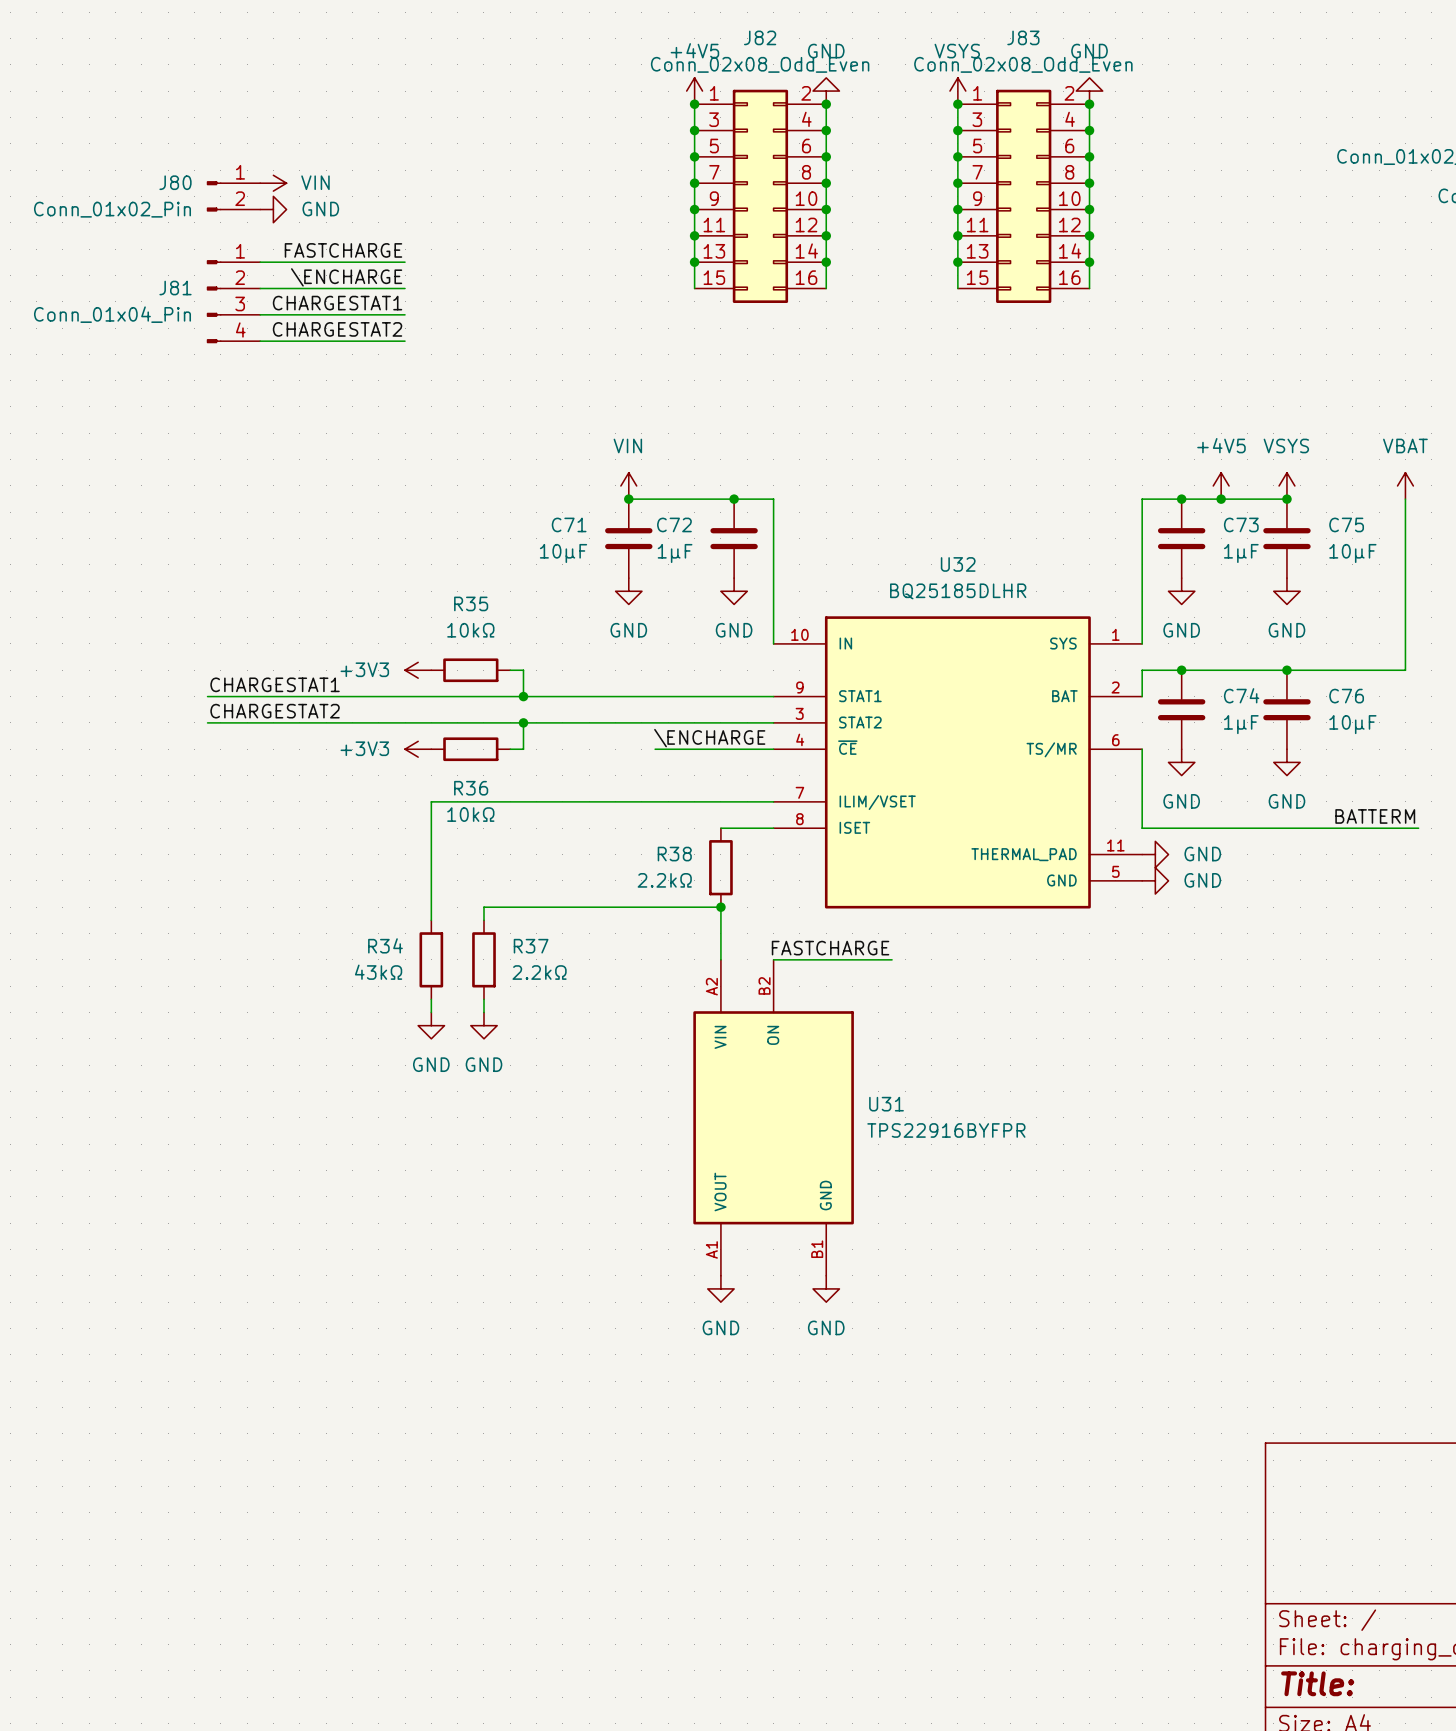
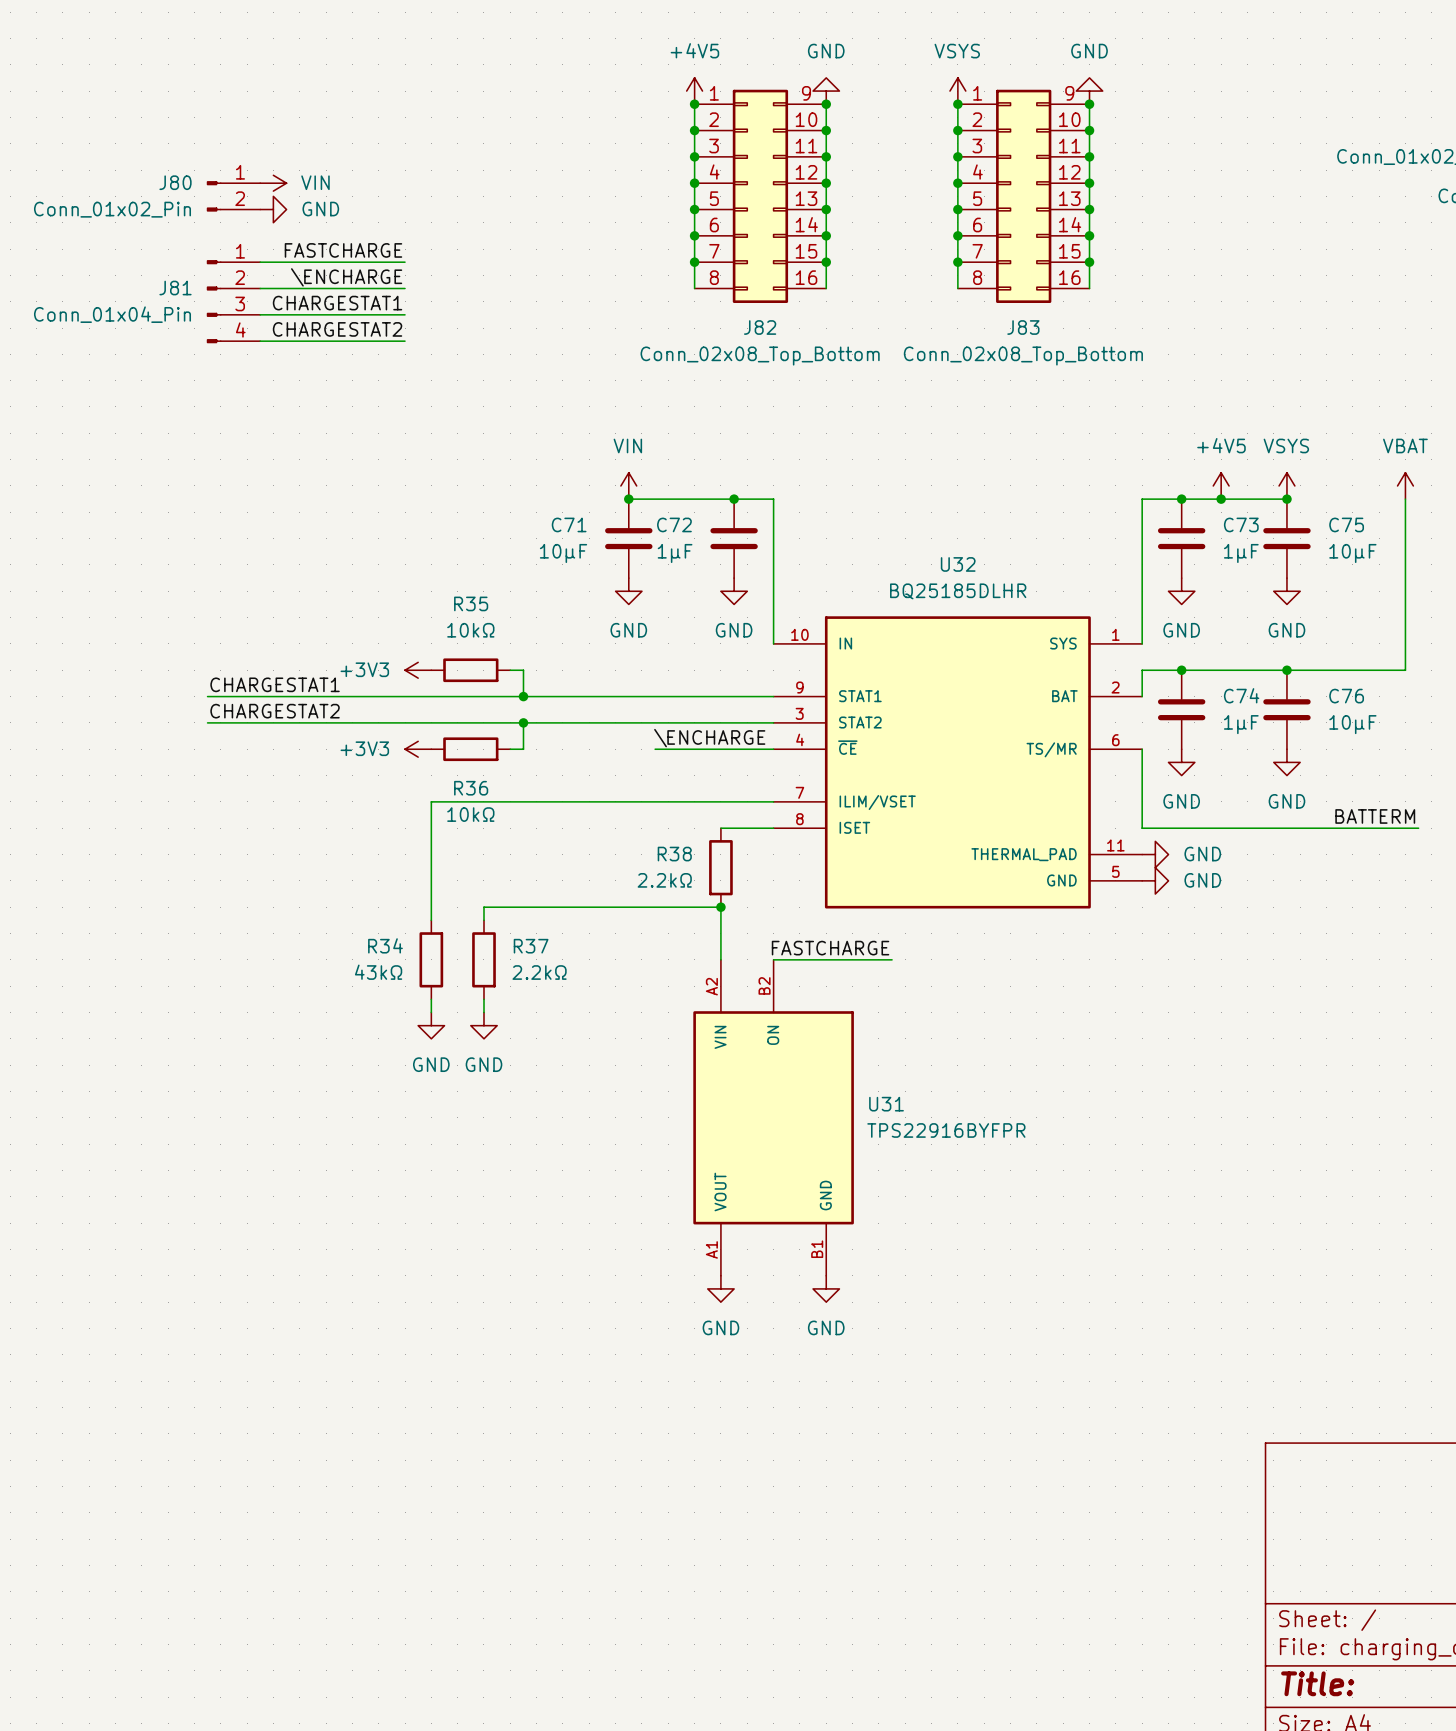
J82 name position: J82 (760, 37) -> J82 (760, 327)
J83 name position: J83 (1023, 37) -> J83 (1023, 327)
J82 value: Conn_02x08_Odd_Even (760, 64) -> Conn_02x08_Top_Bottom (760, 356)
J83 value: Conn_02x08_Odd_Even (1023, 64) -> Conn_02x08_Top_Bottom (1023, 356)
J82 symbol: [694, 89, 827, 303] -> [694, 89, 827, 303]
J83 symbol: [957, 89, 1090, 303] -> [957, 89, 1090, 303]

